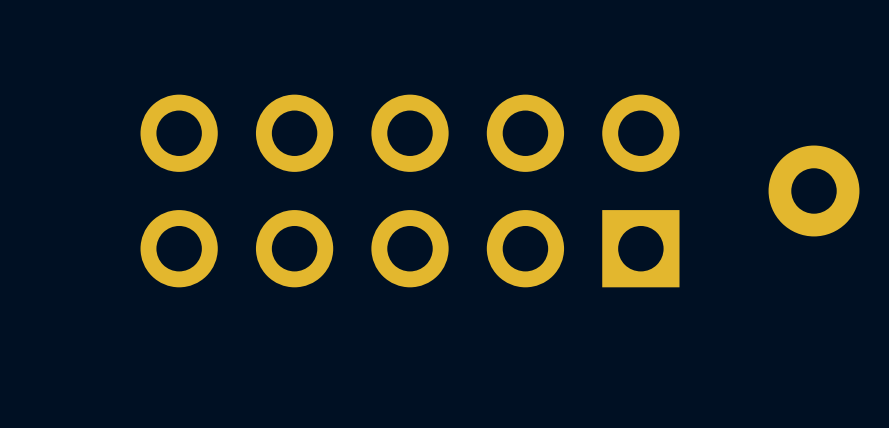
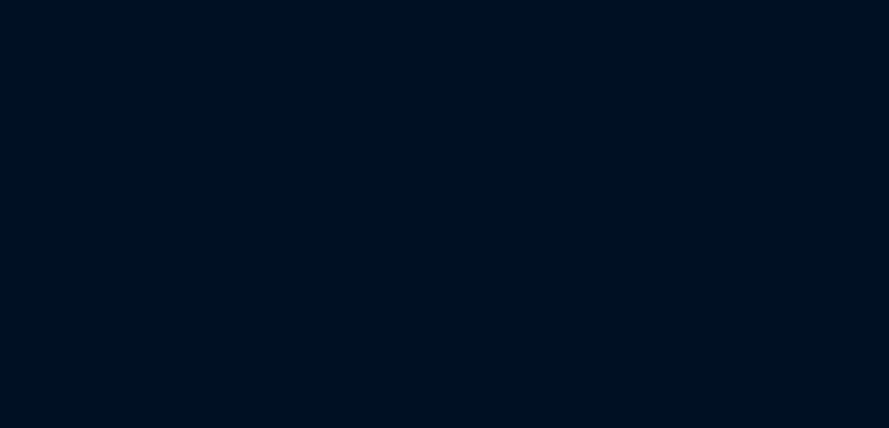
part: (410, 190) -> none
part: (814, 190) -> none

